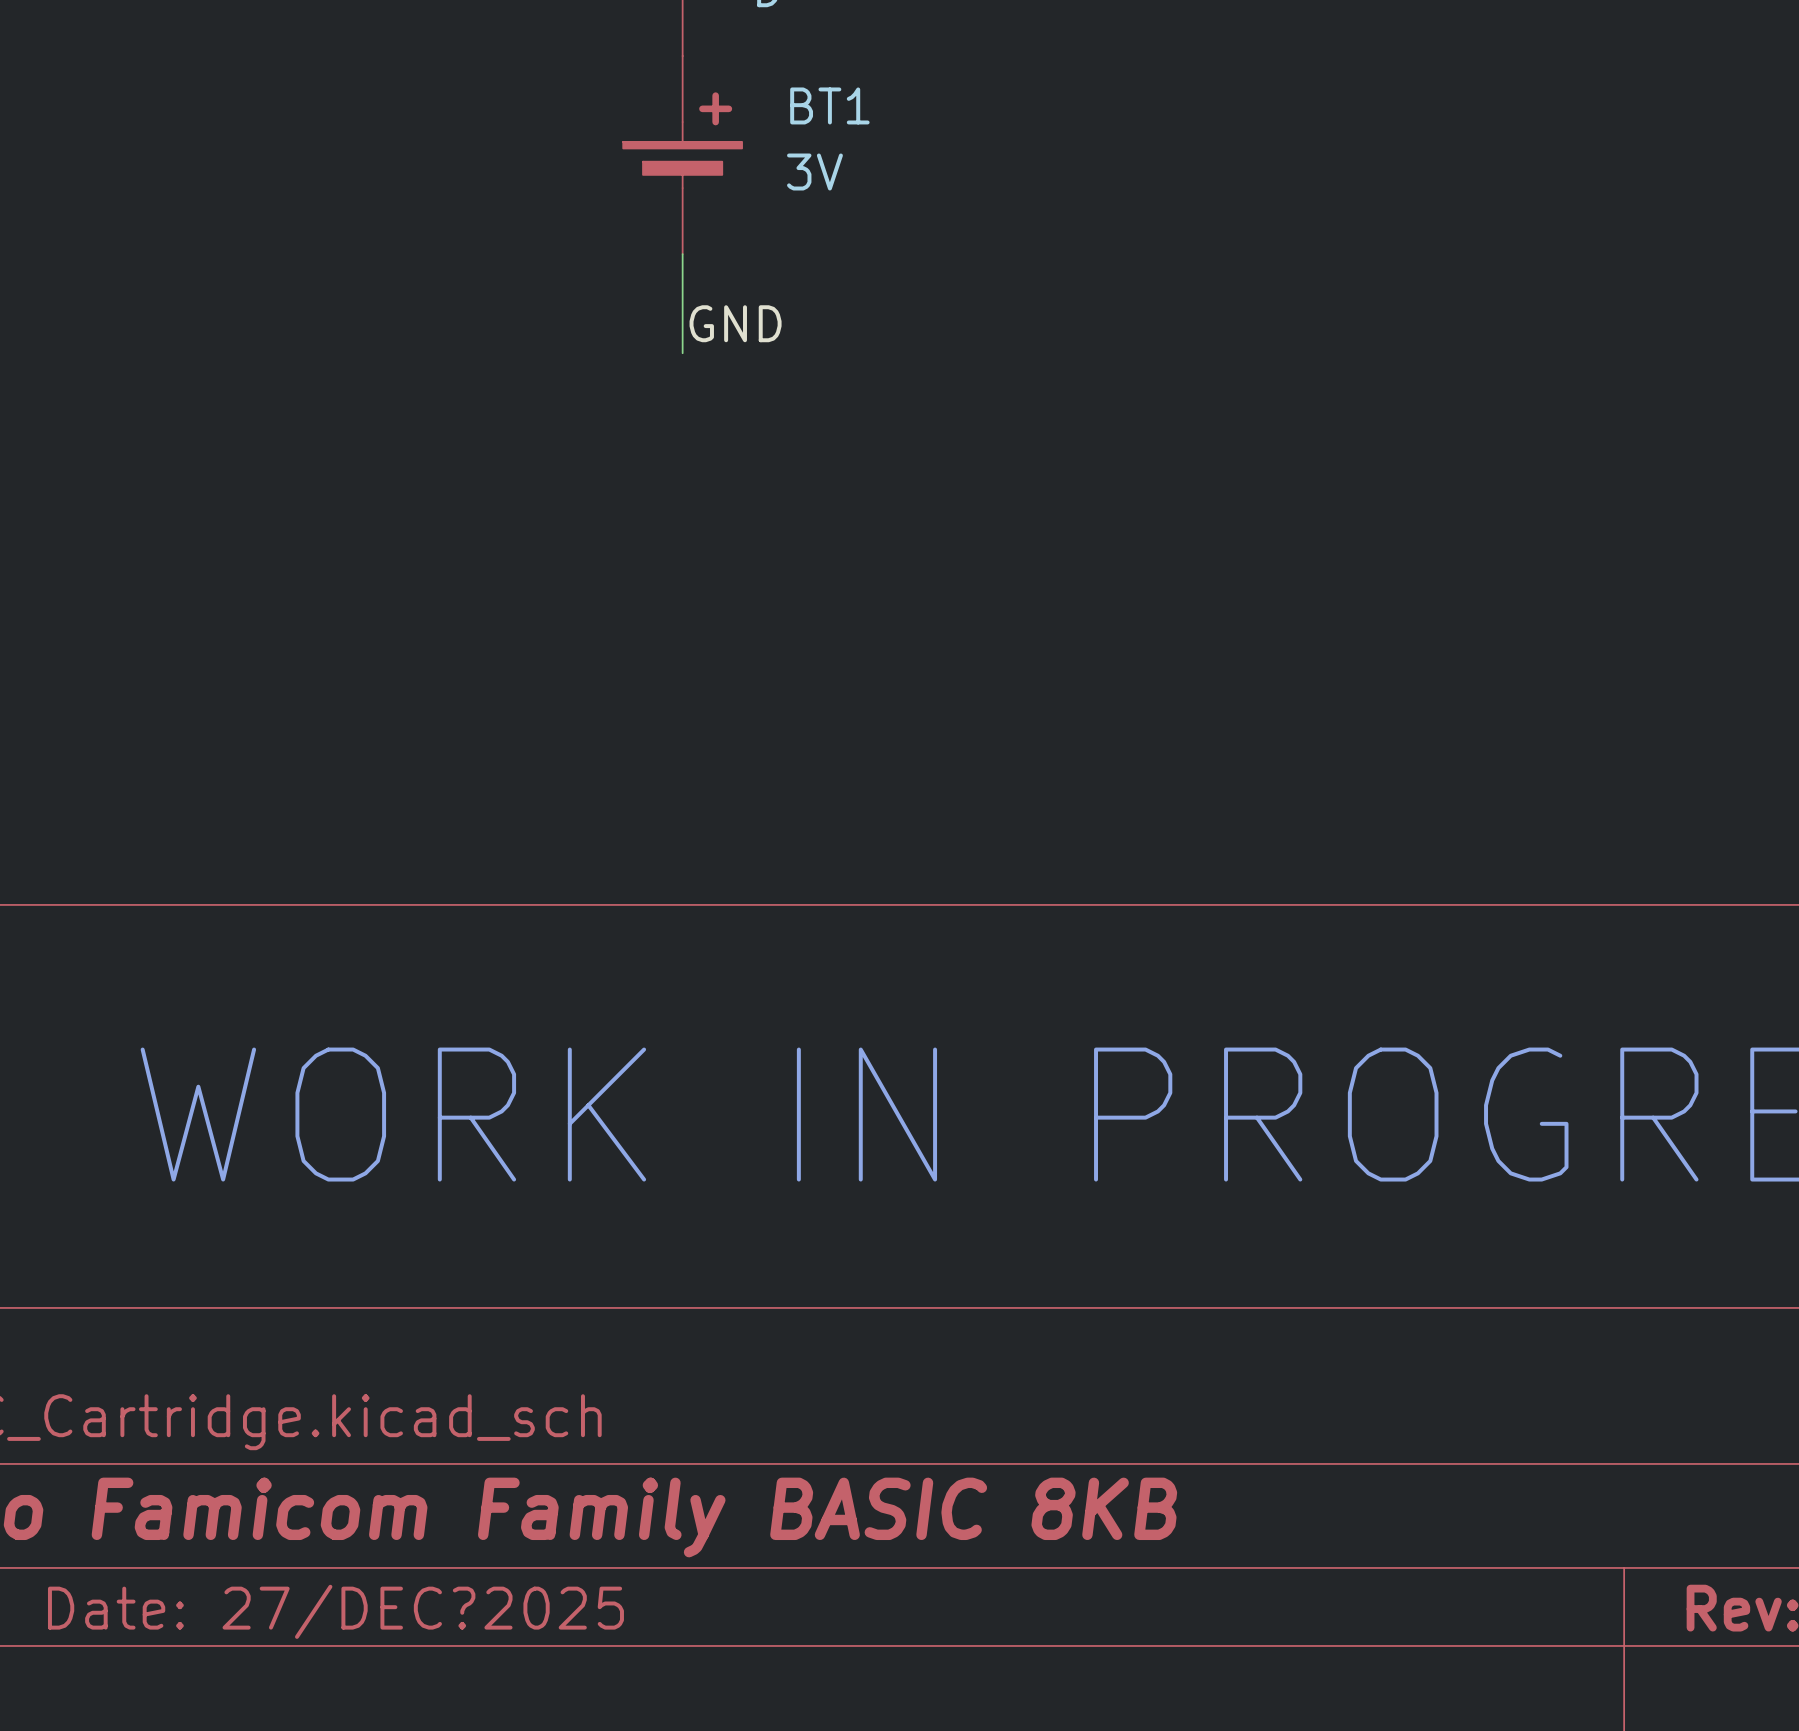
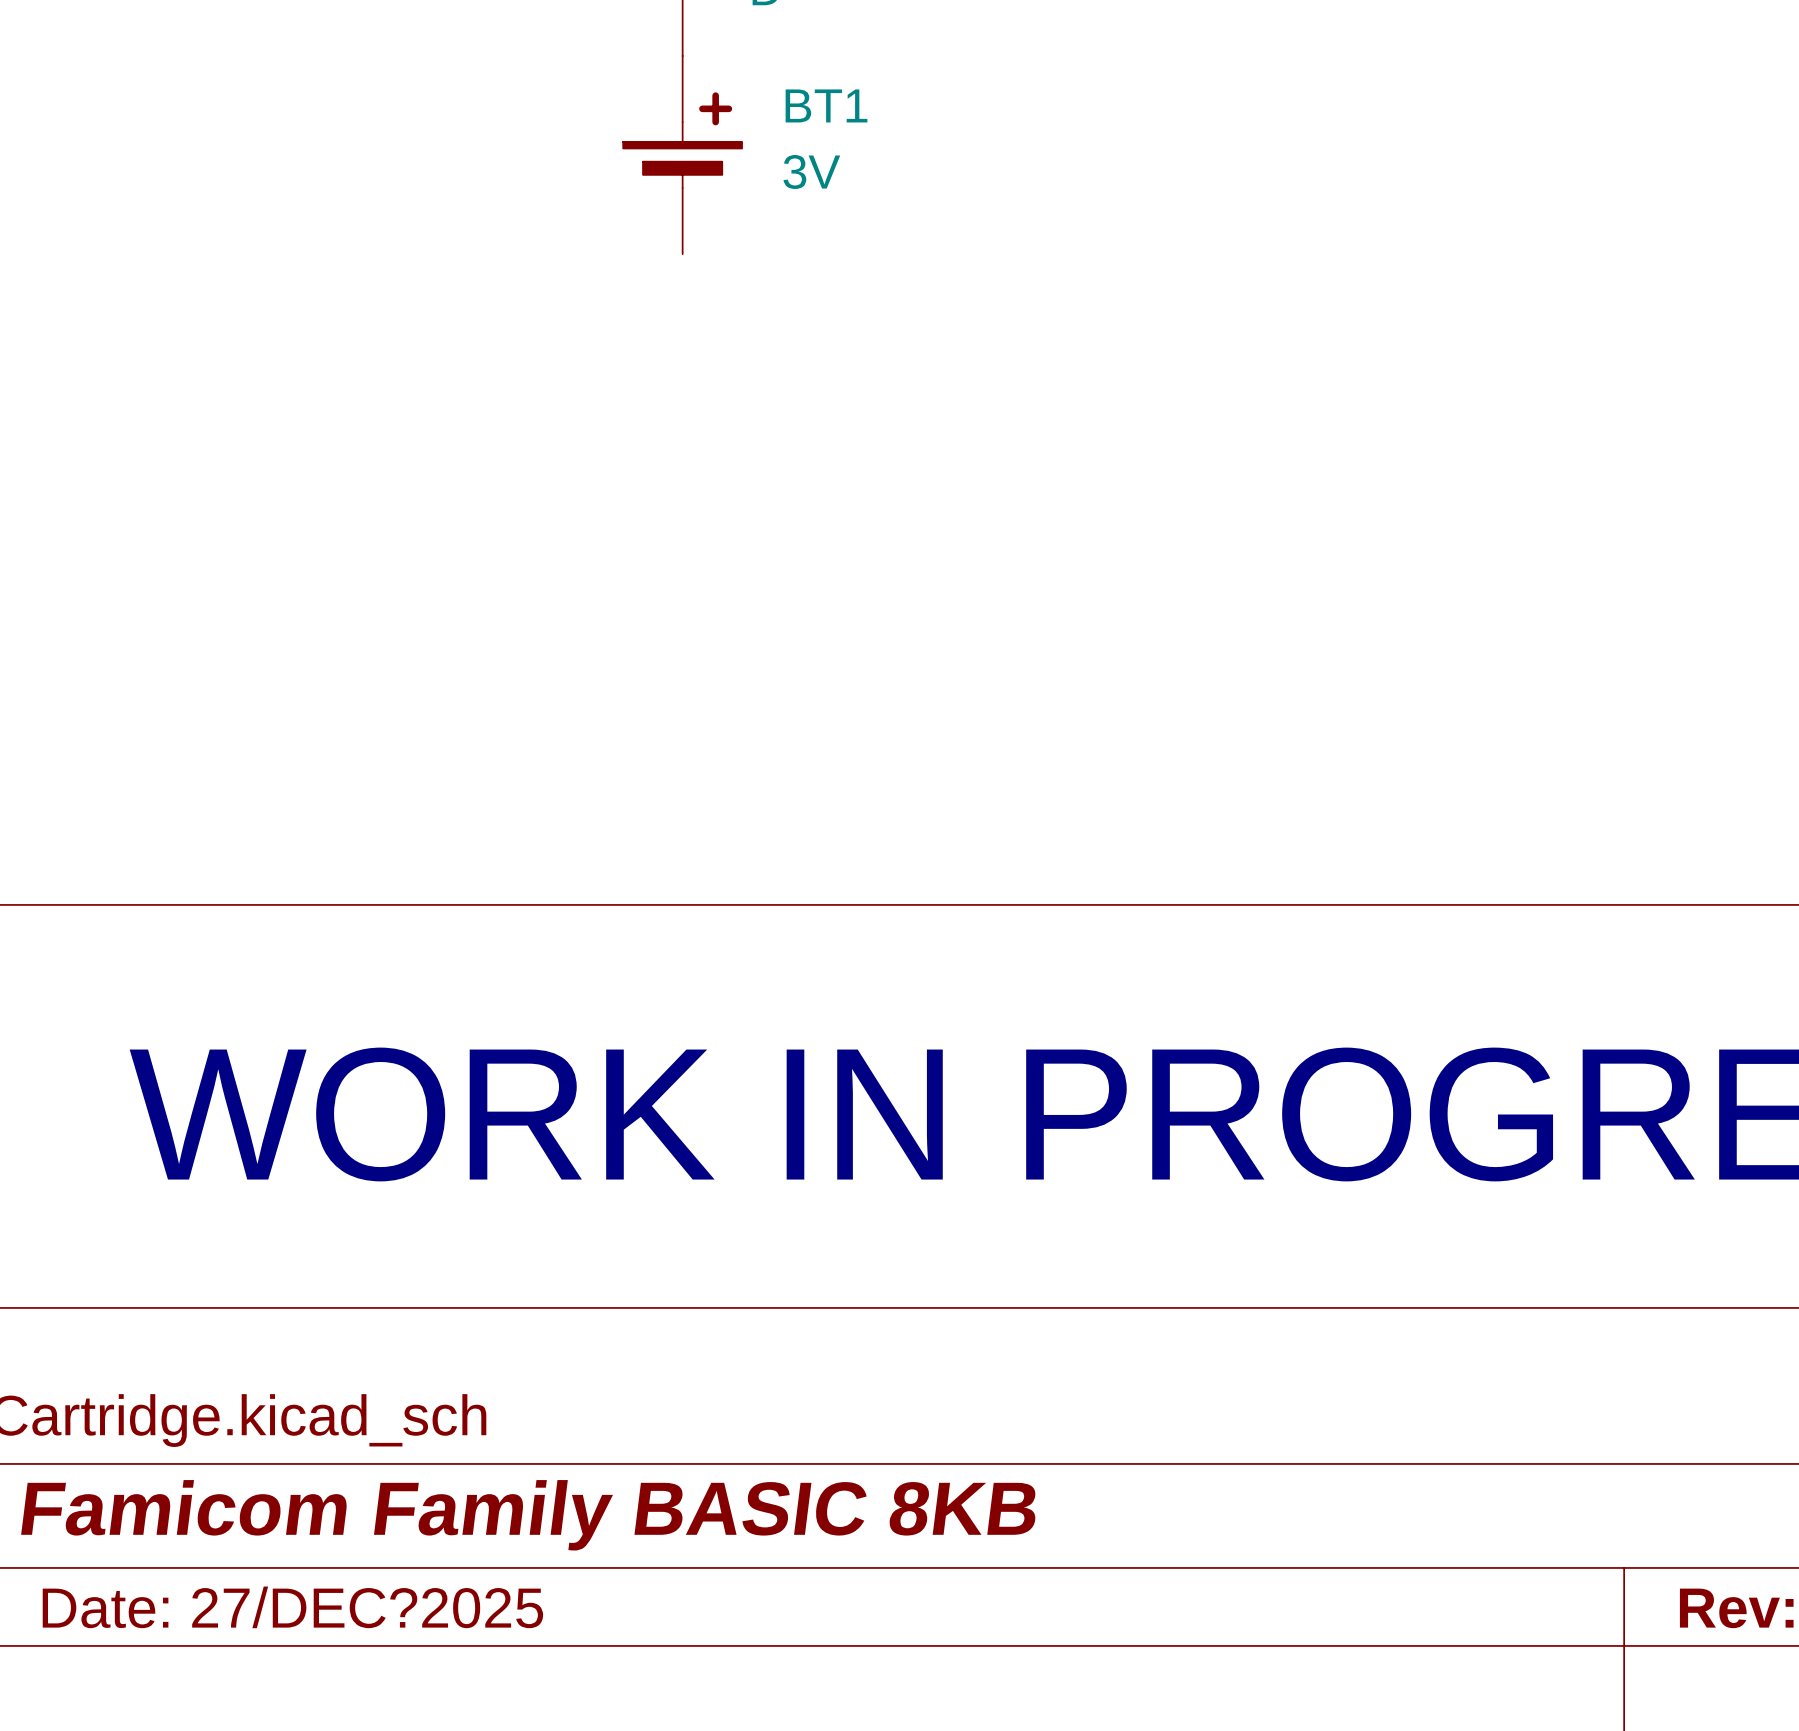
wire: (682, 254) (682, 353) -> none
label: GND (735, 323) -> none

